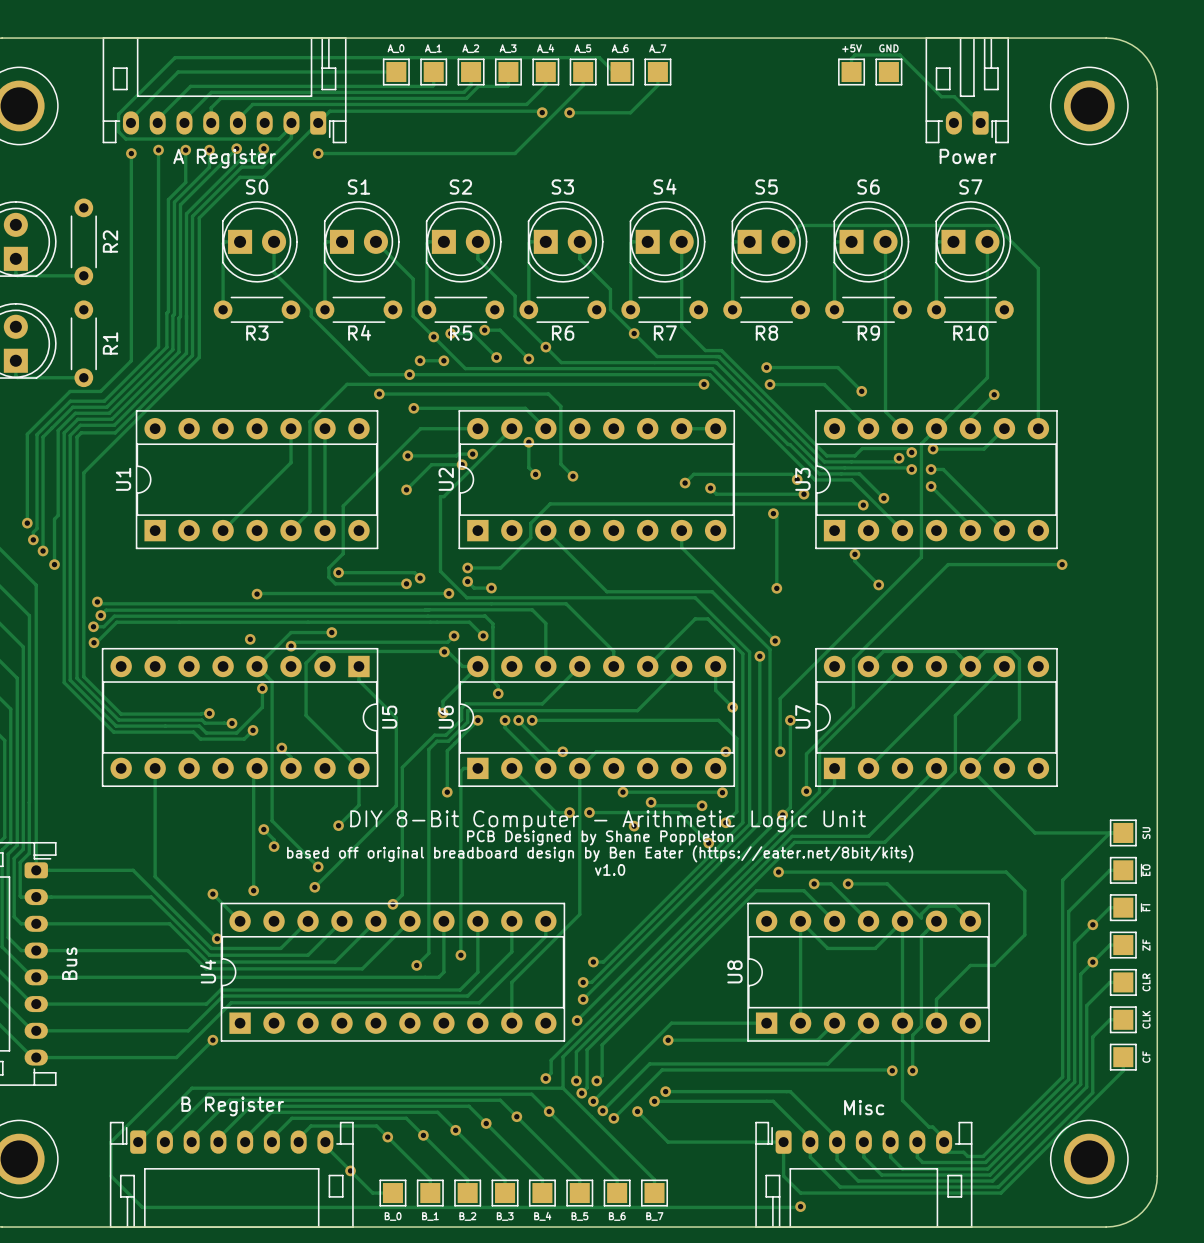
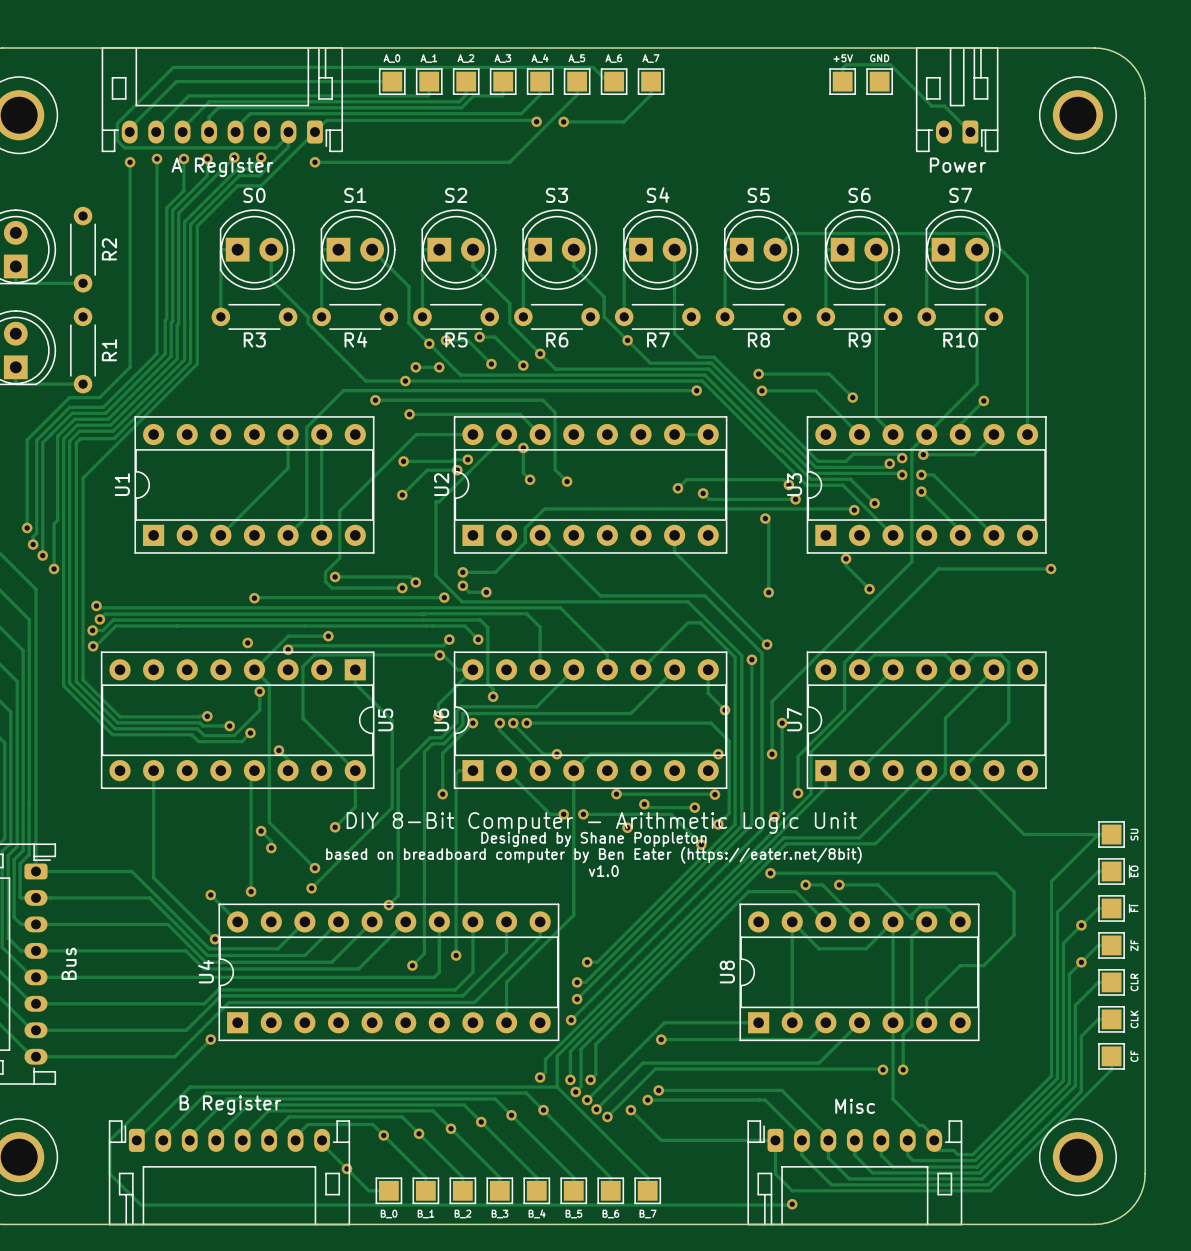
text: PCB Designed by Shane Poppleton (600, 837) -> Designed by Shane Poppleton (593, 839)
text: based off original breadboard design by Ben Eater (https://eater.net/8bit/kits) (600, 853) -> based on breadboard computer by Ben Eater (https://eater.net/8bit) (593, 855)

